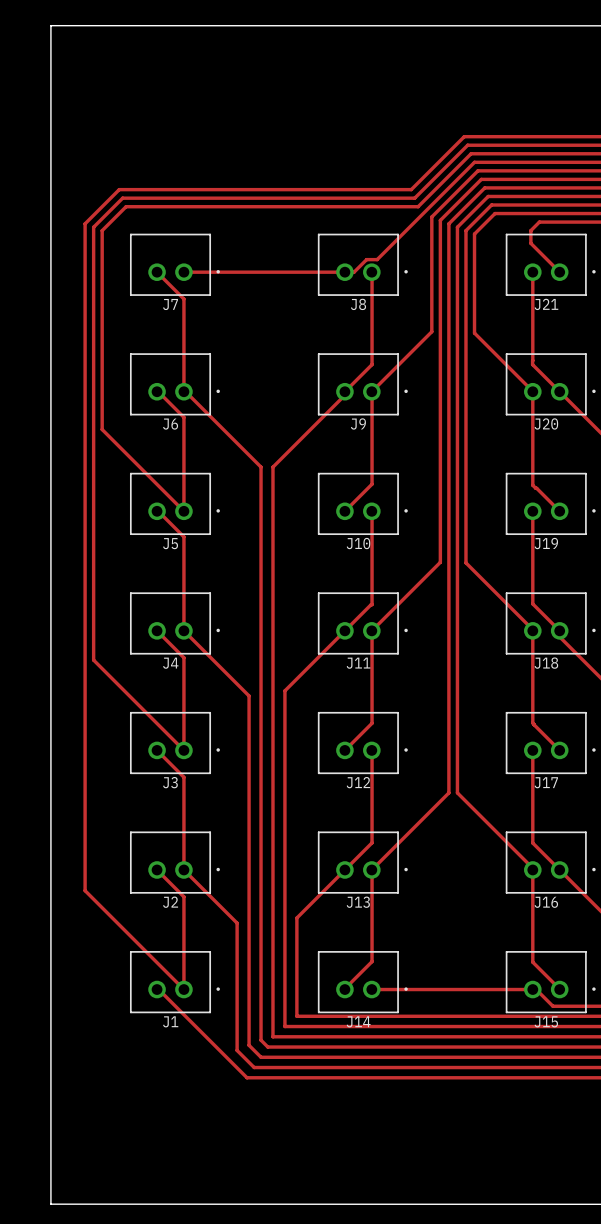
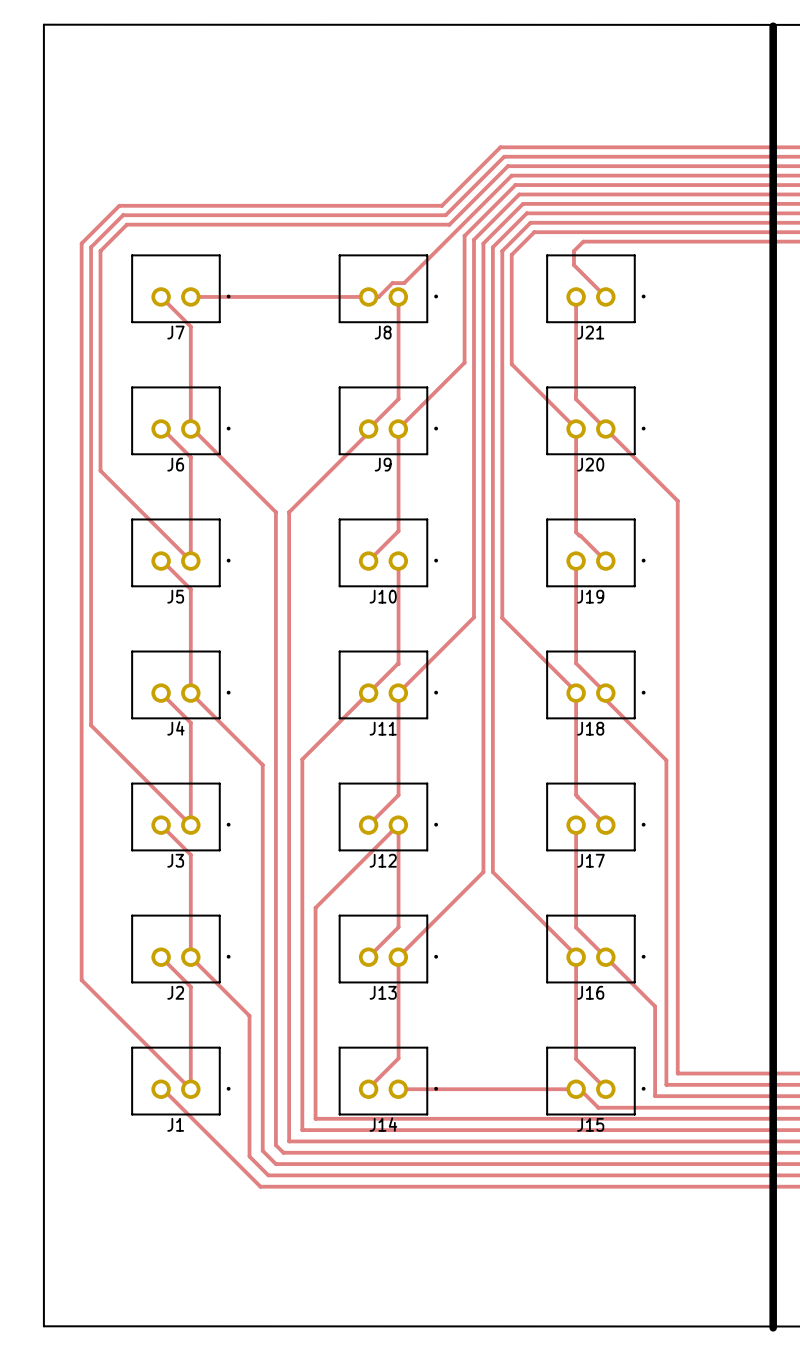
top track: (344, 869) (296, 918) -> (398, 825) (315, 907) (315, 1010)

